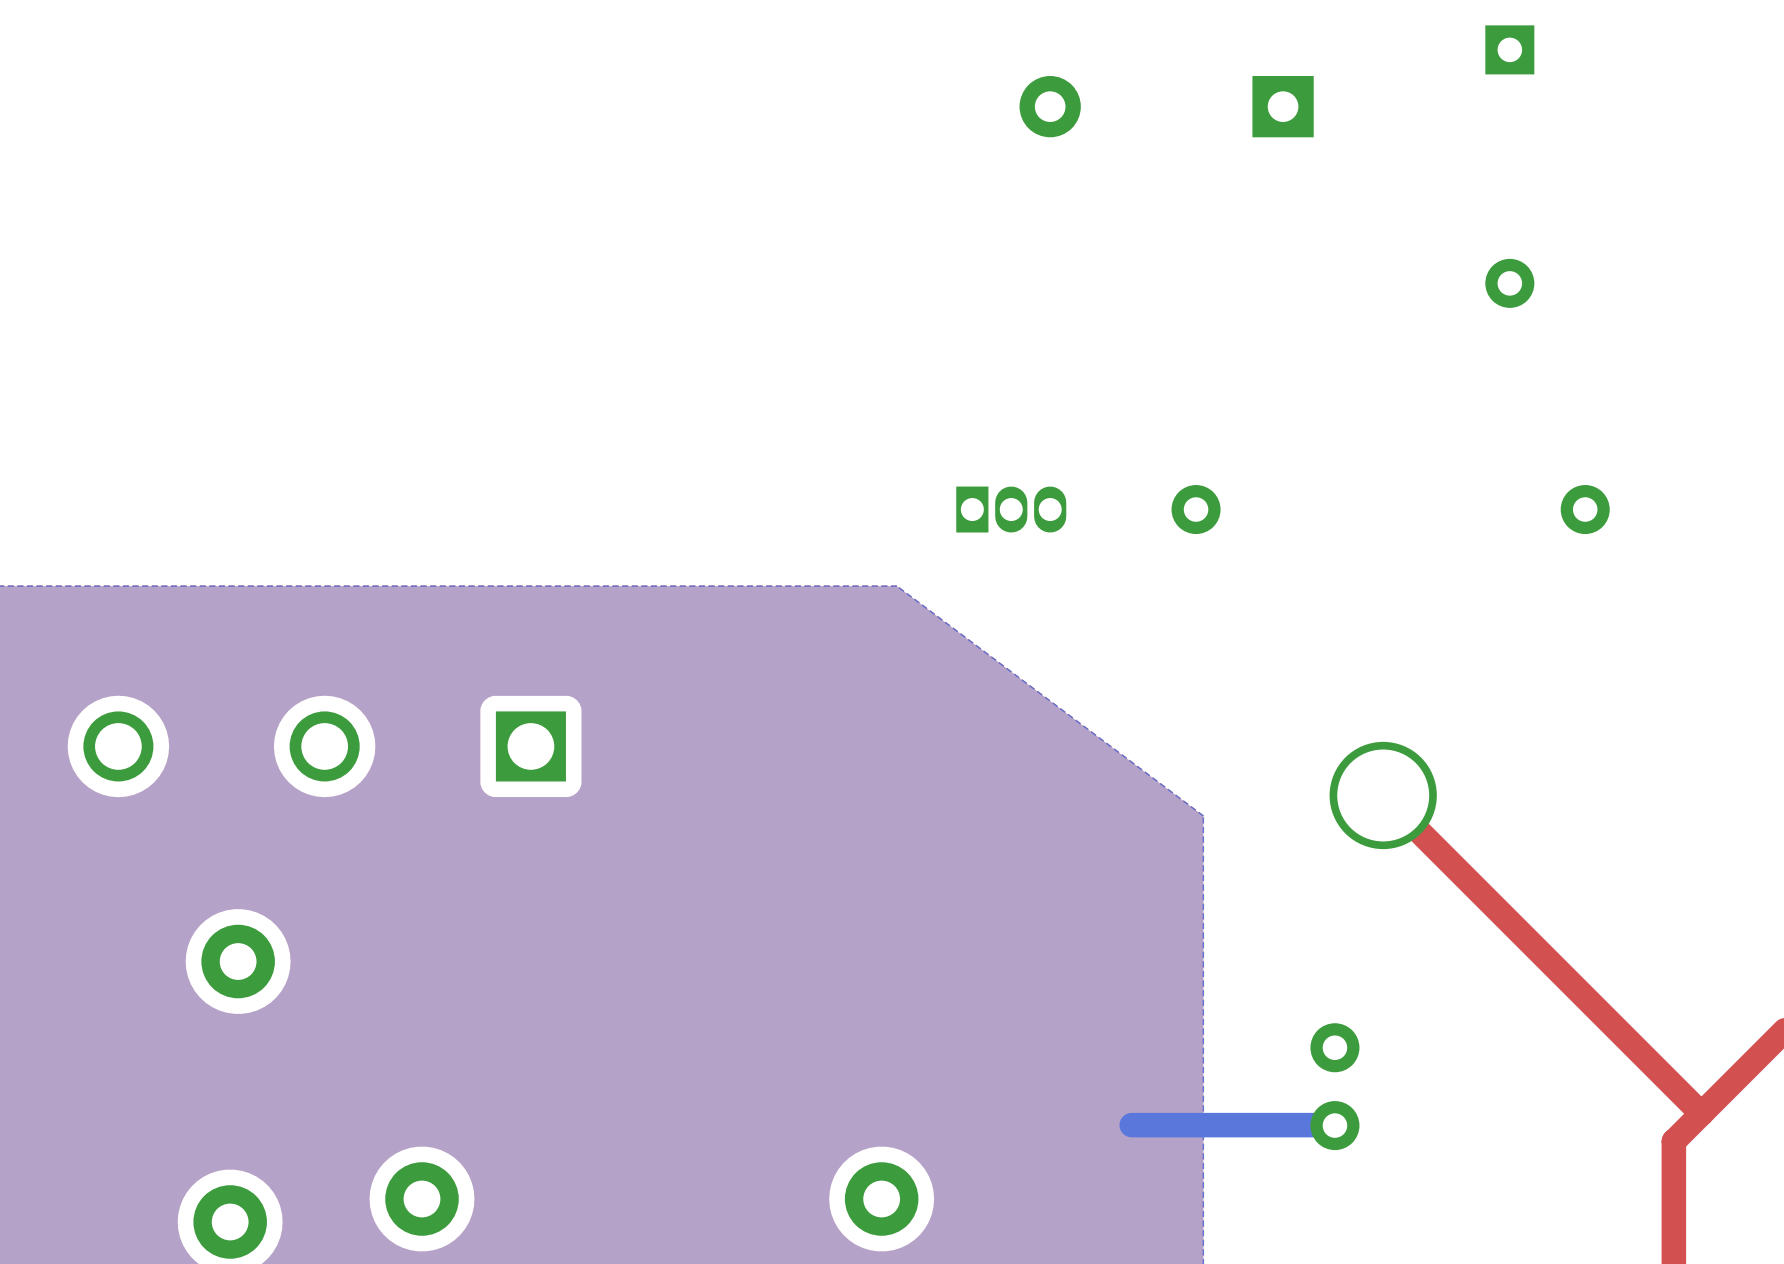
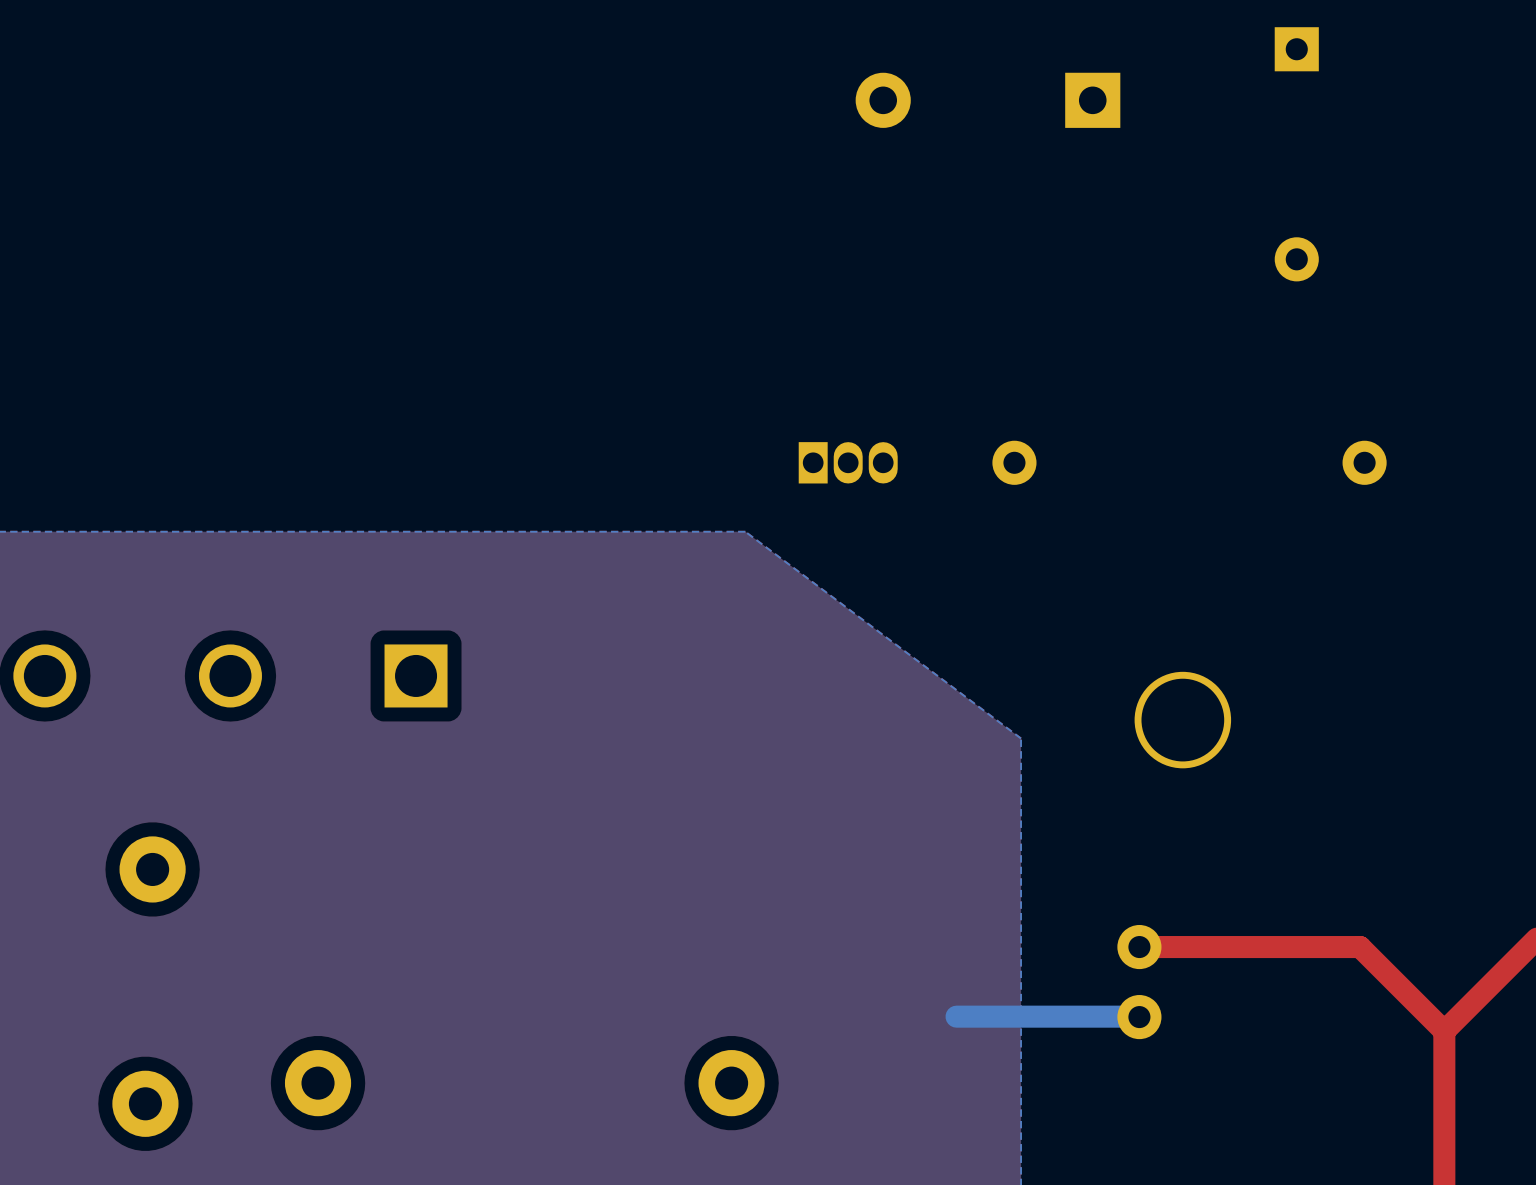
top track: (1383, 795) (1701, 1113) -> none
top track: none -> (1139, 947) (1360, 947) (1444, 1031)

